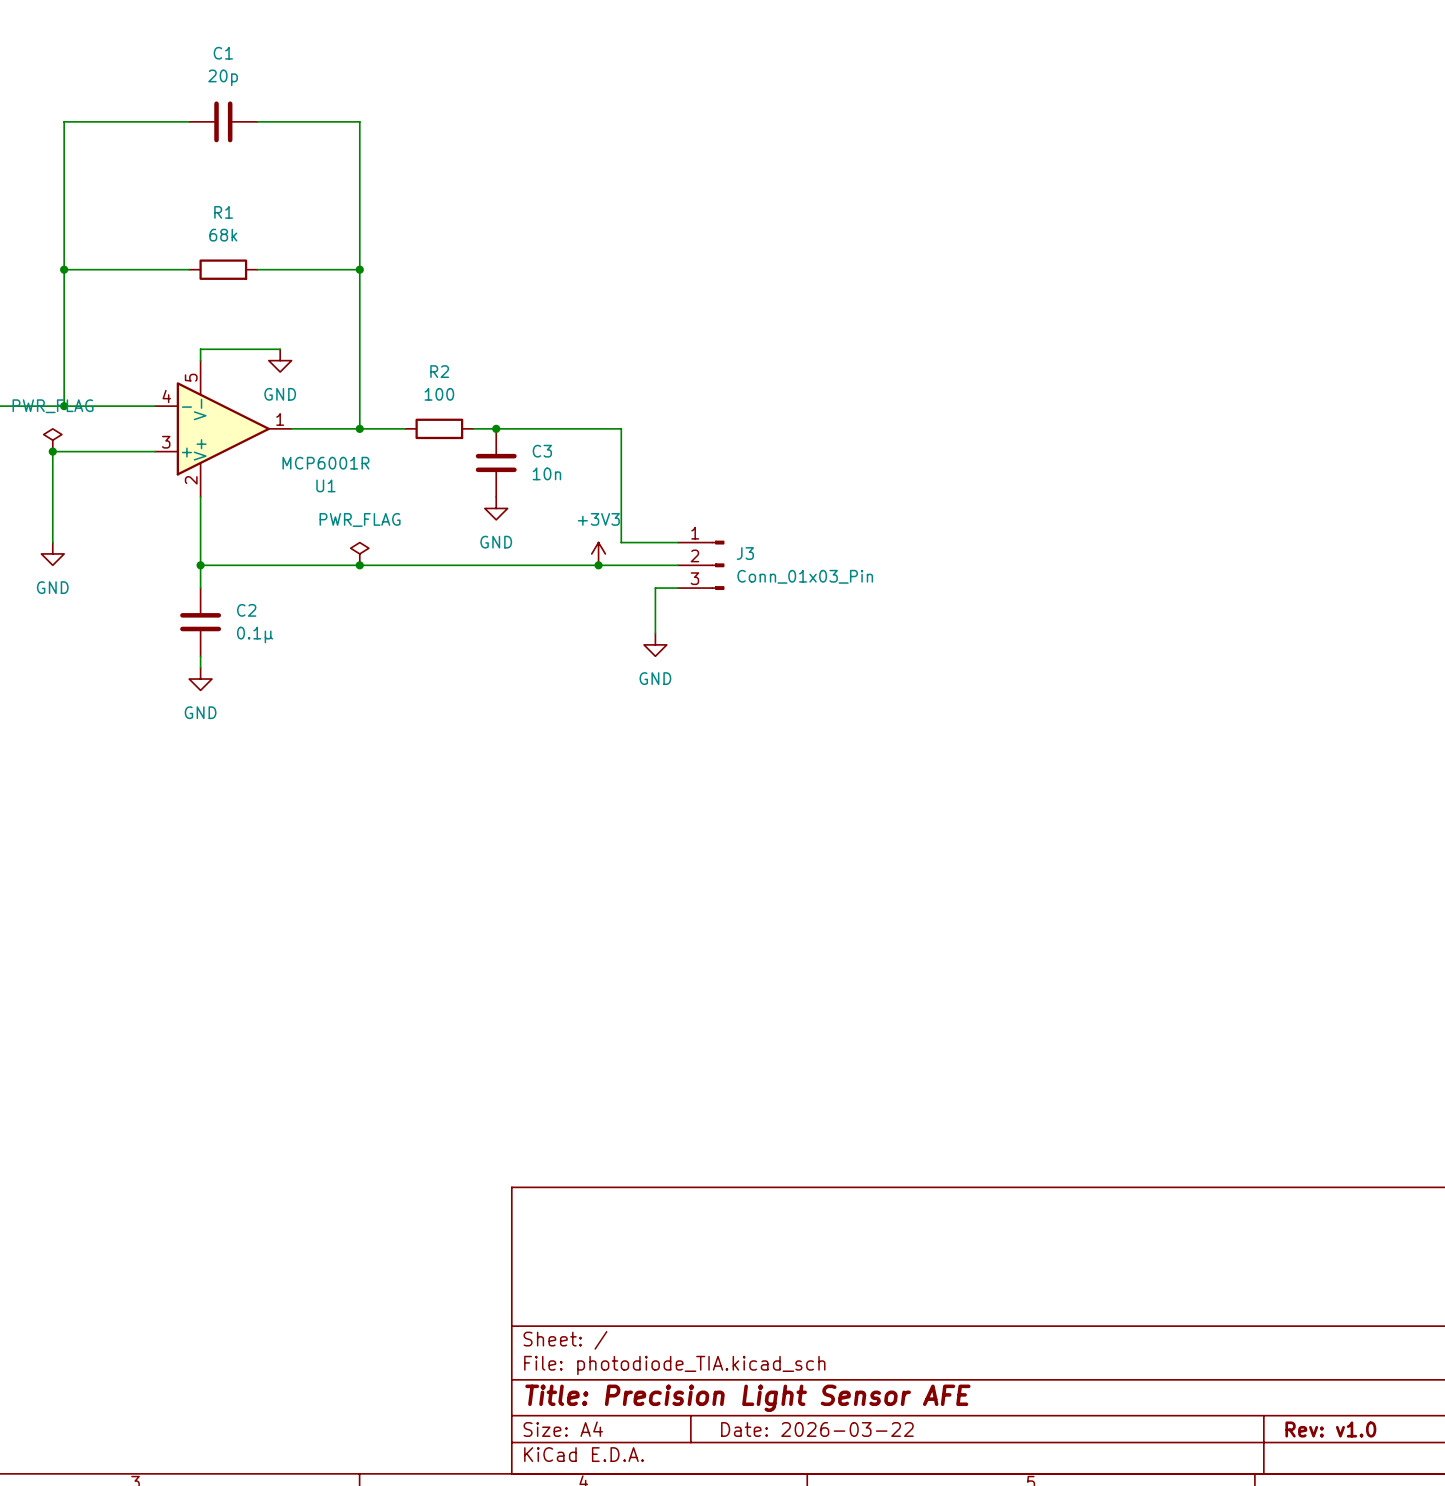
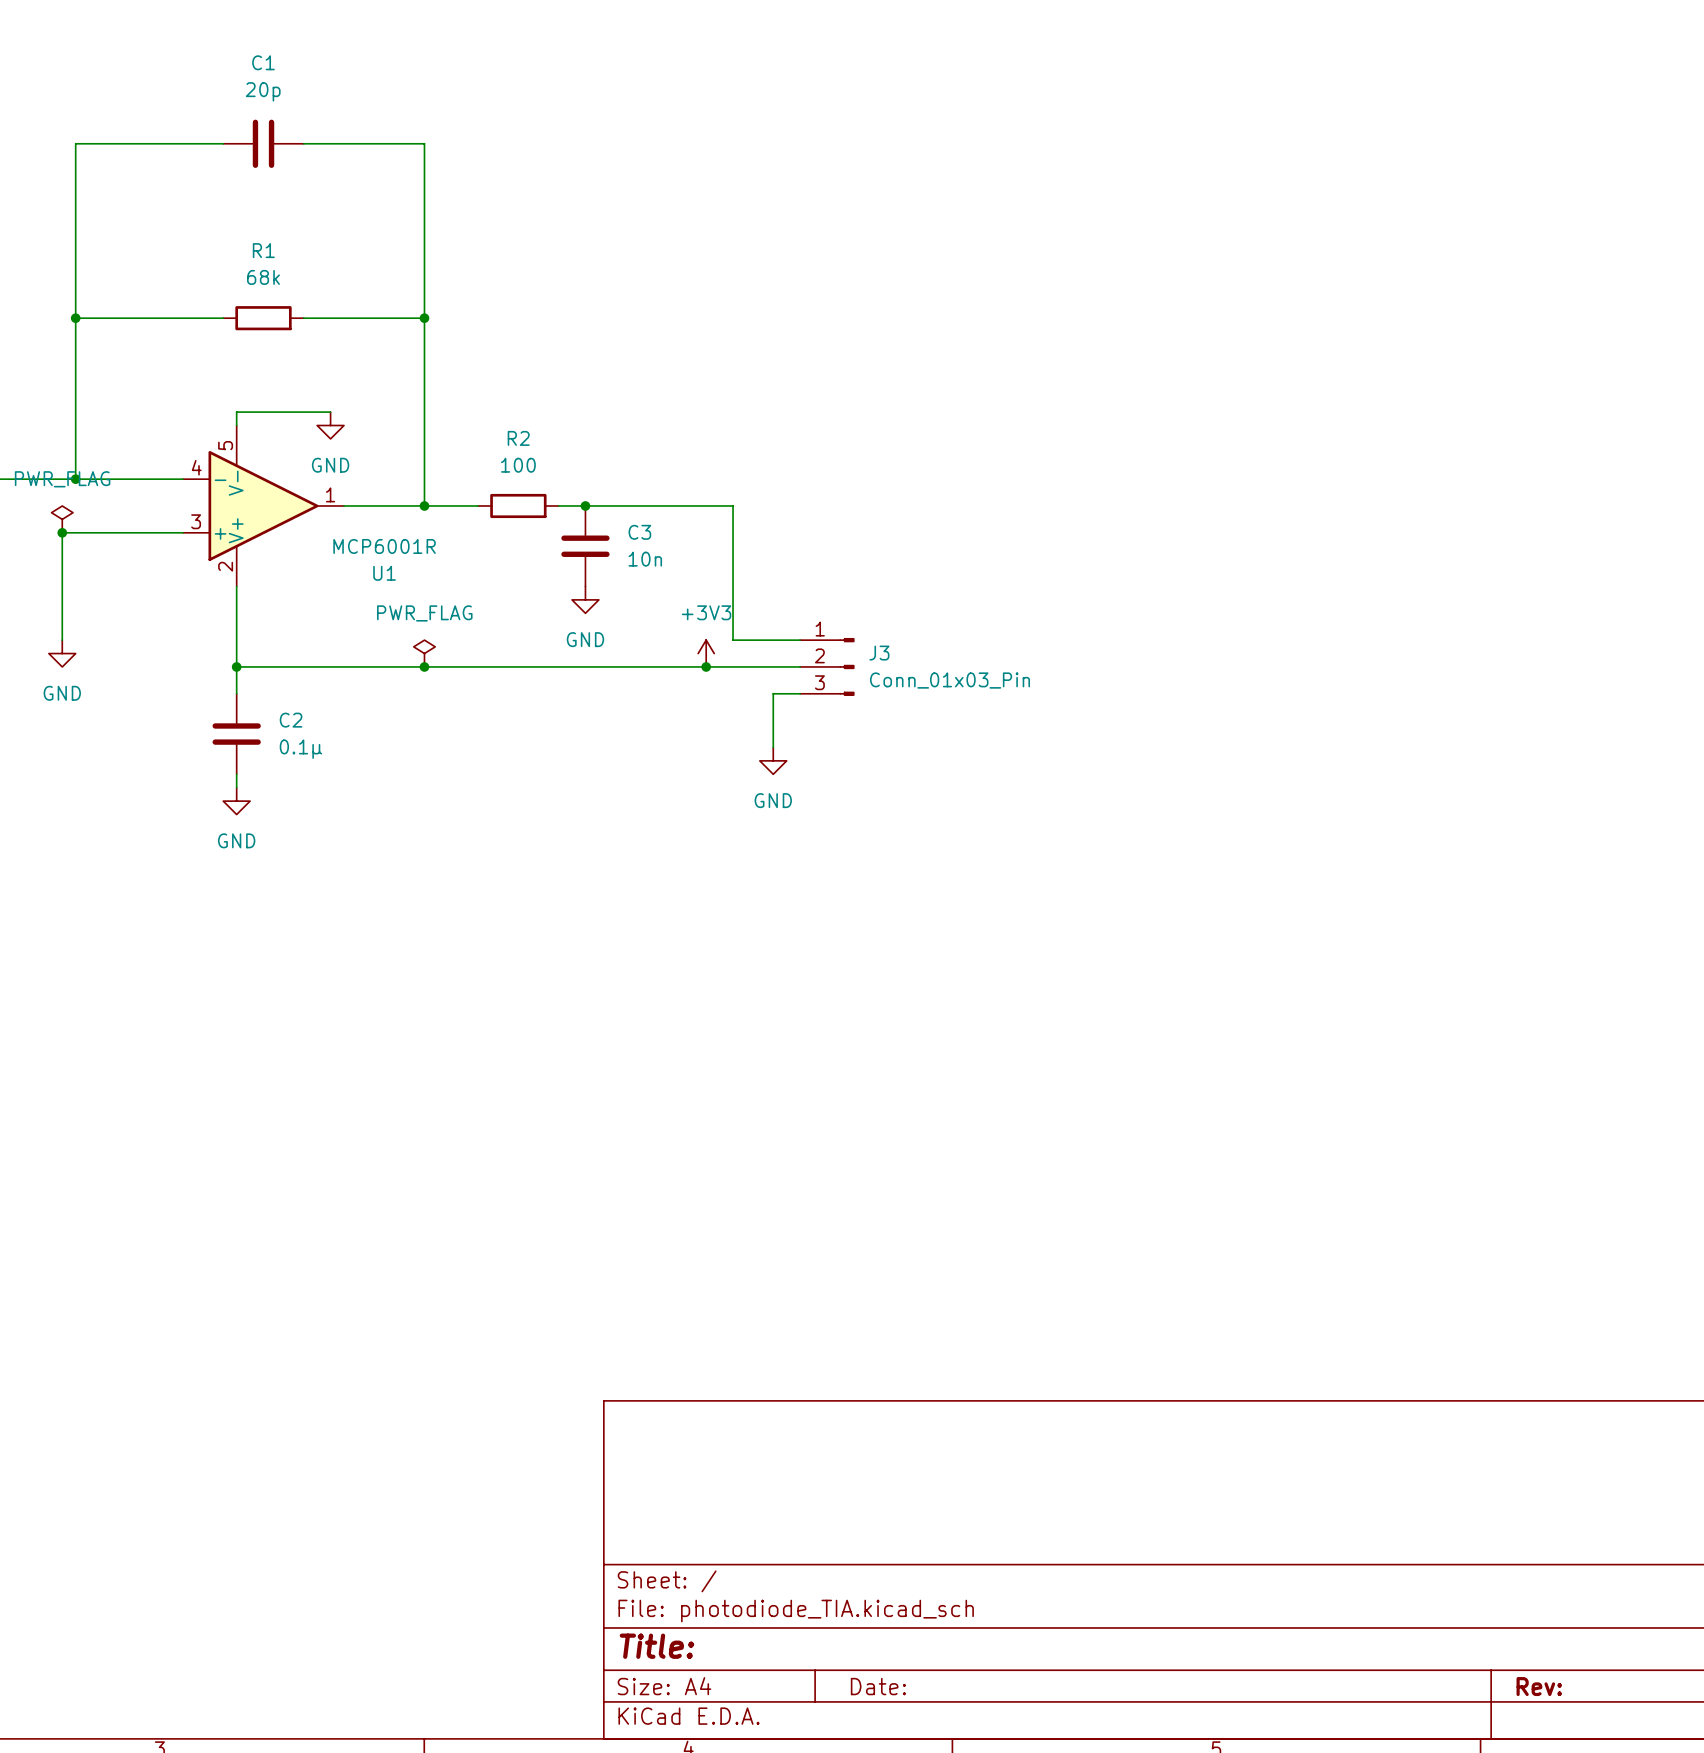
title block: Title: Precision Light Sensor AFE (747, 1398) -> Title: (656, 1646)
title block: Date: 2026-03-22 (817, 1429) -> Date: (878, 1686)
title block: Rev: v1.0 (1330, 1429) -> Rev: (1539, 1686)

